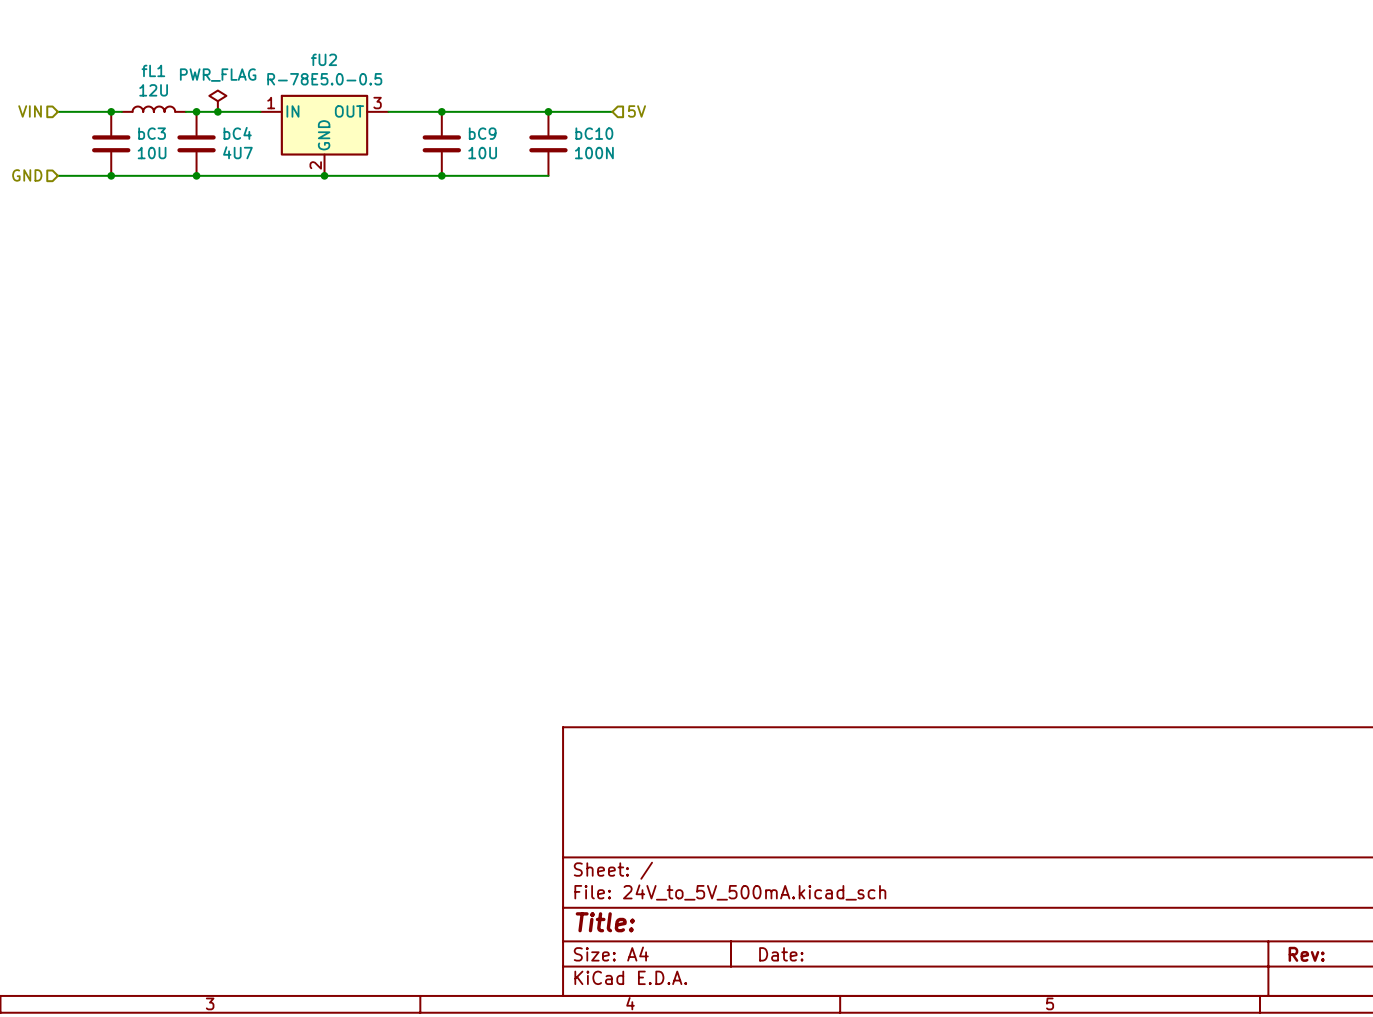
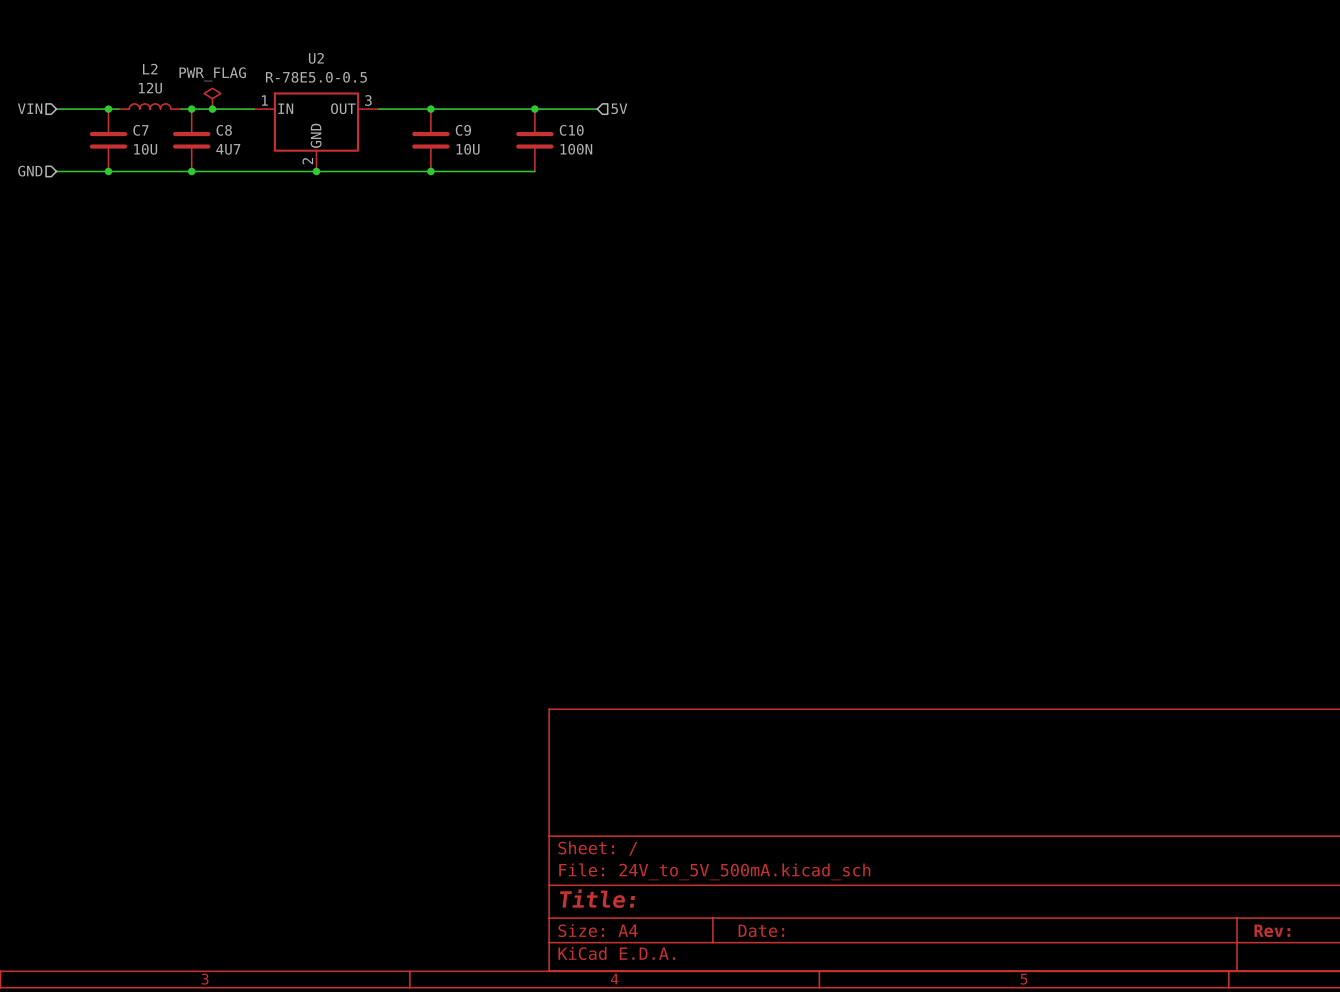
fU2 name: fU2 (324, 59) -> U2 (316, 58)
fL1 name: fL1 (153, 70) -> L2 (150, 69)
bC3 name: bC3 (152, 133) -> C7 (140, 130)
bC4 name: bC4 (237, 133) -> C8 (224, 130)
bC9 name: bC9 (482, 133) -> C9 (463, 130)
bC10 name: bC10 (594, 133) -> C10 (571, 130)

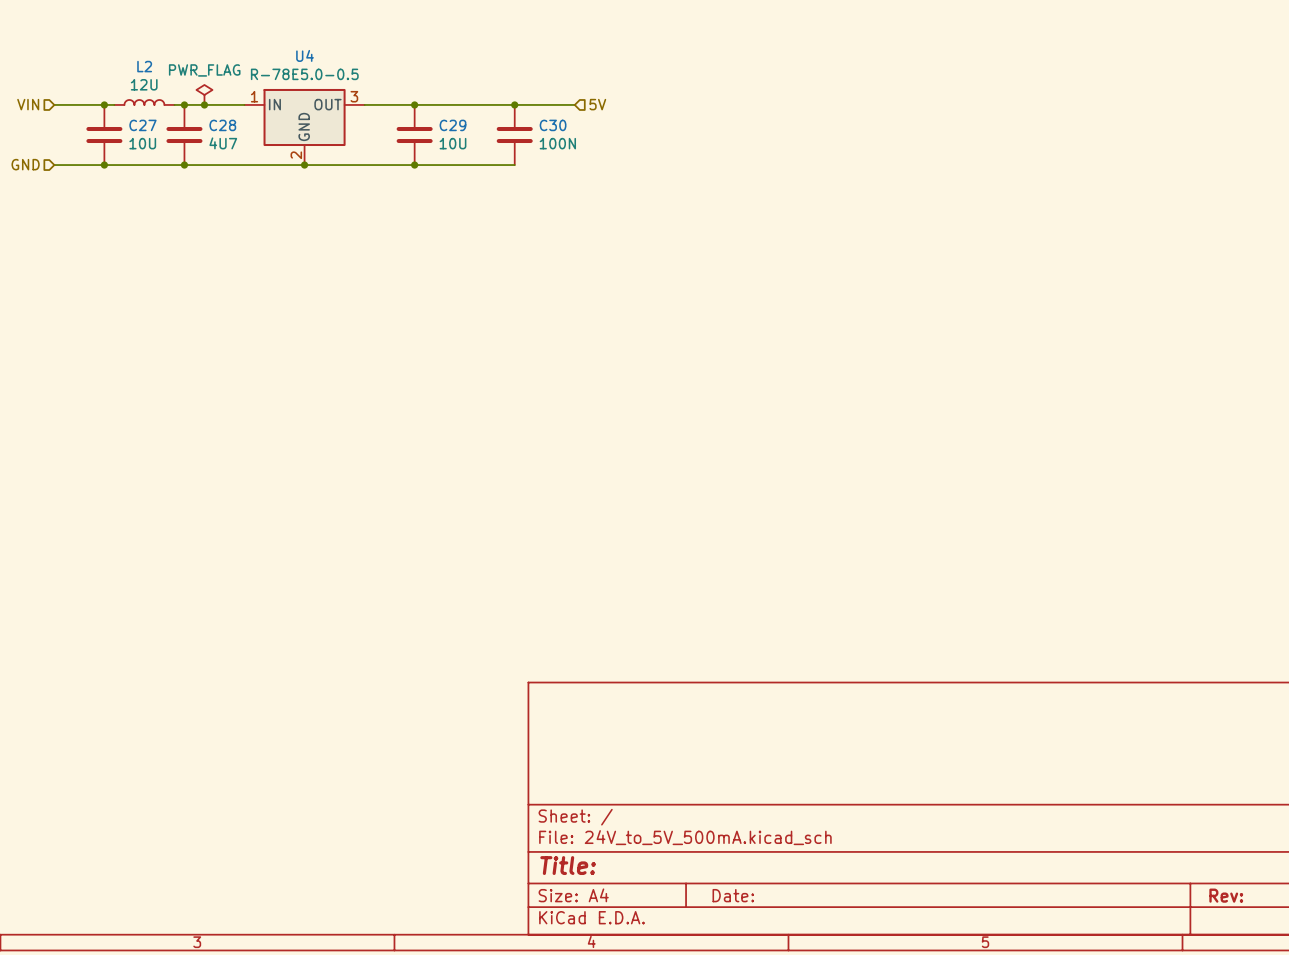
U2 name: U2 (316, 58) -> U4 (305, 55)
C7 name: C7 (140, 130) -> C27 (142, 125)
C8 name: C8 (224, 130) -> C28 (222, 125)
C9 name: C9 (463, 130) -> C29 (452, 125)
C10 name: C10 (571, 130) -> C30 (553, 125)

